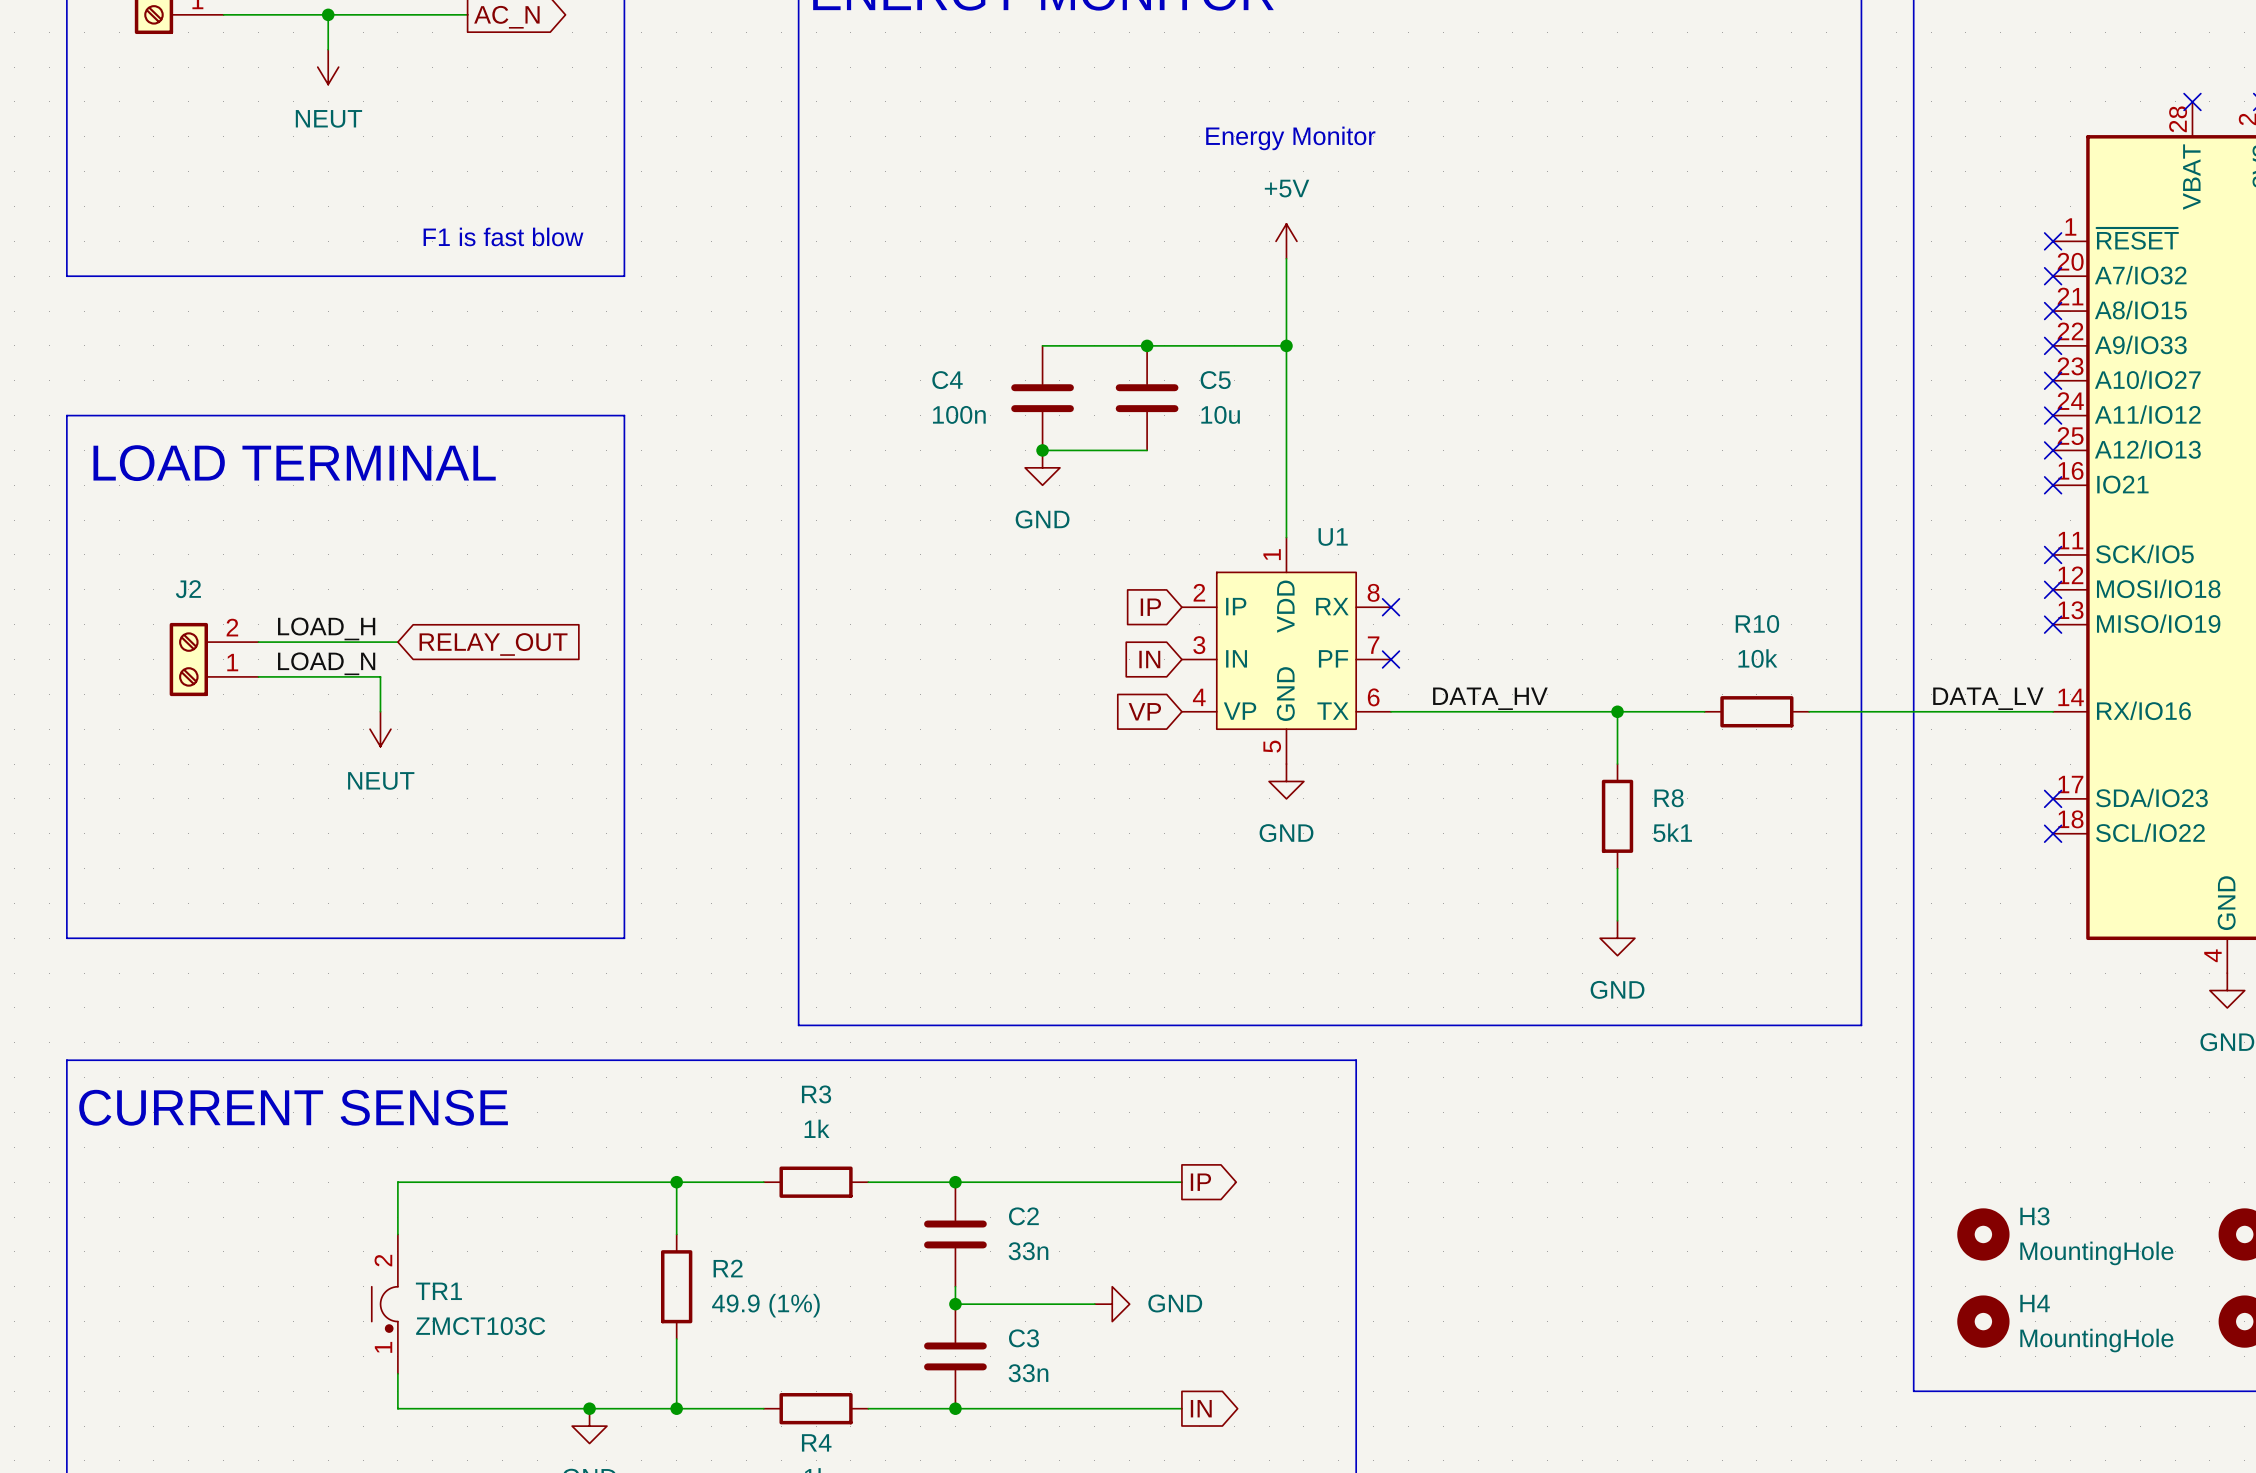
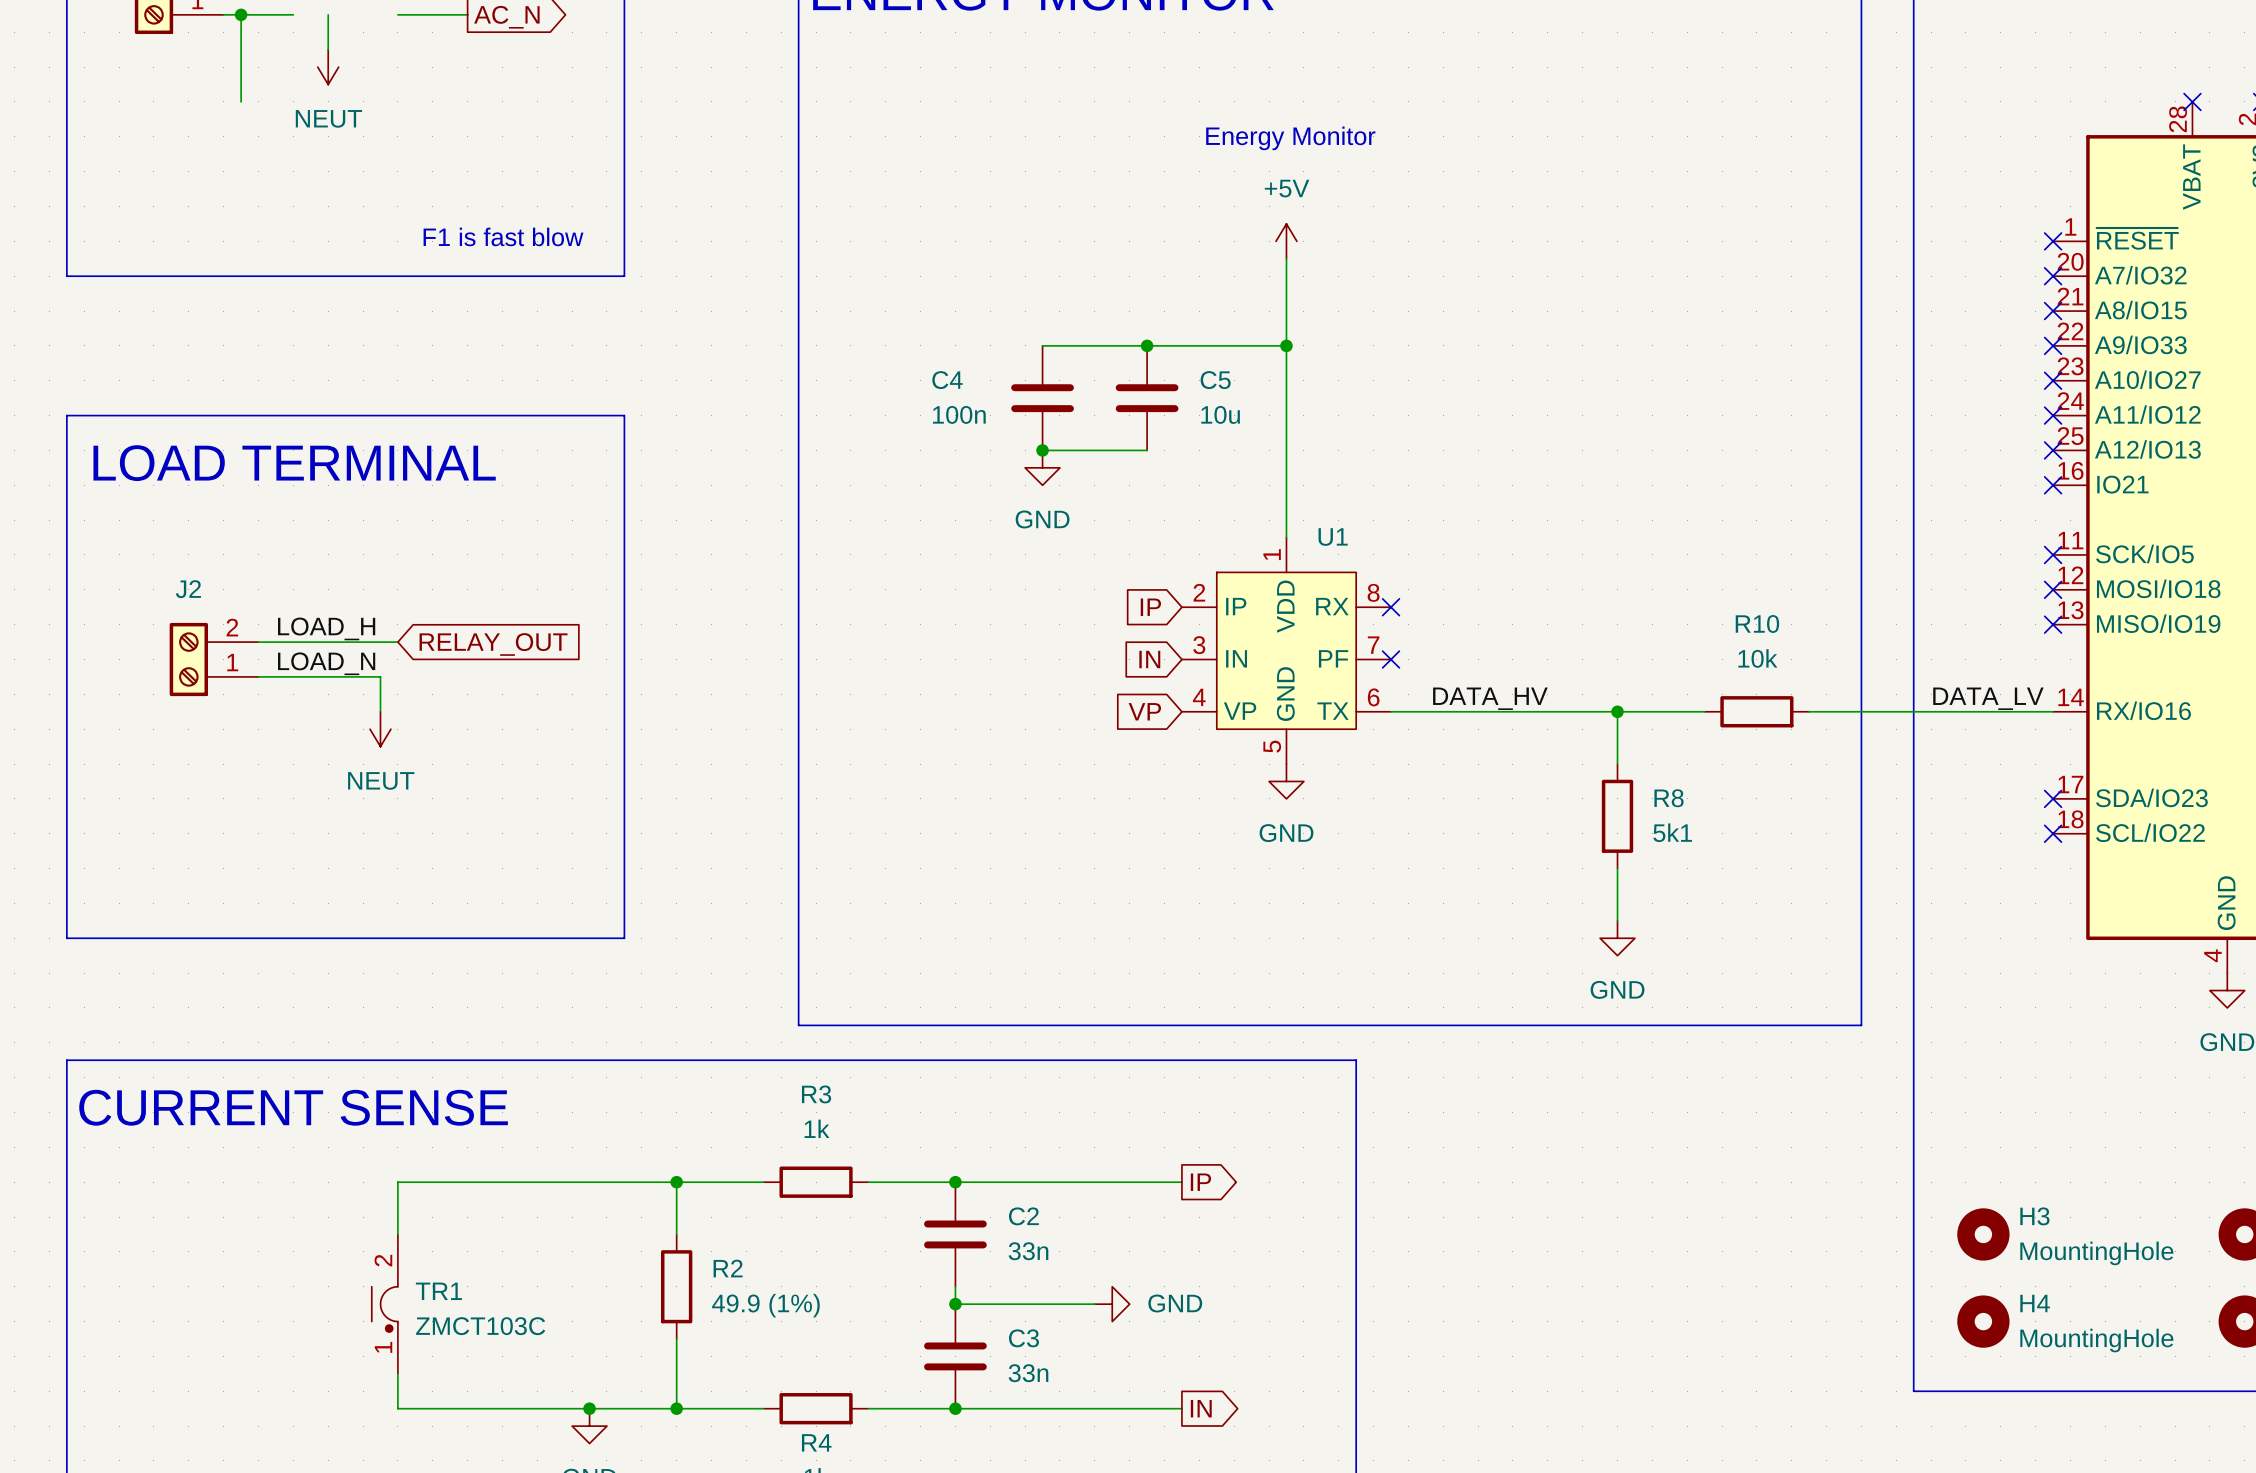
wire: none -> (241, 14) (241, 101)
junction: none -> (241, 14)
wire: (293, 14) (397, 14) -> none
junction: (328, 14) -> none

